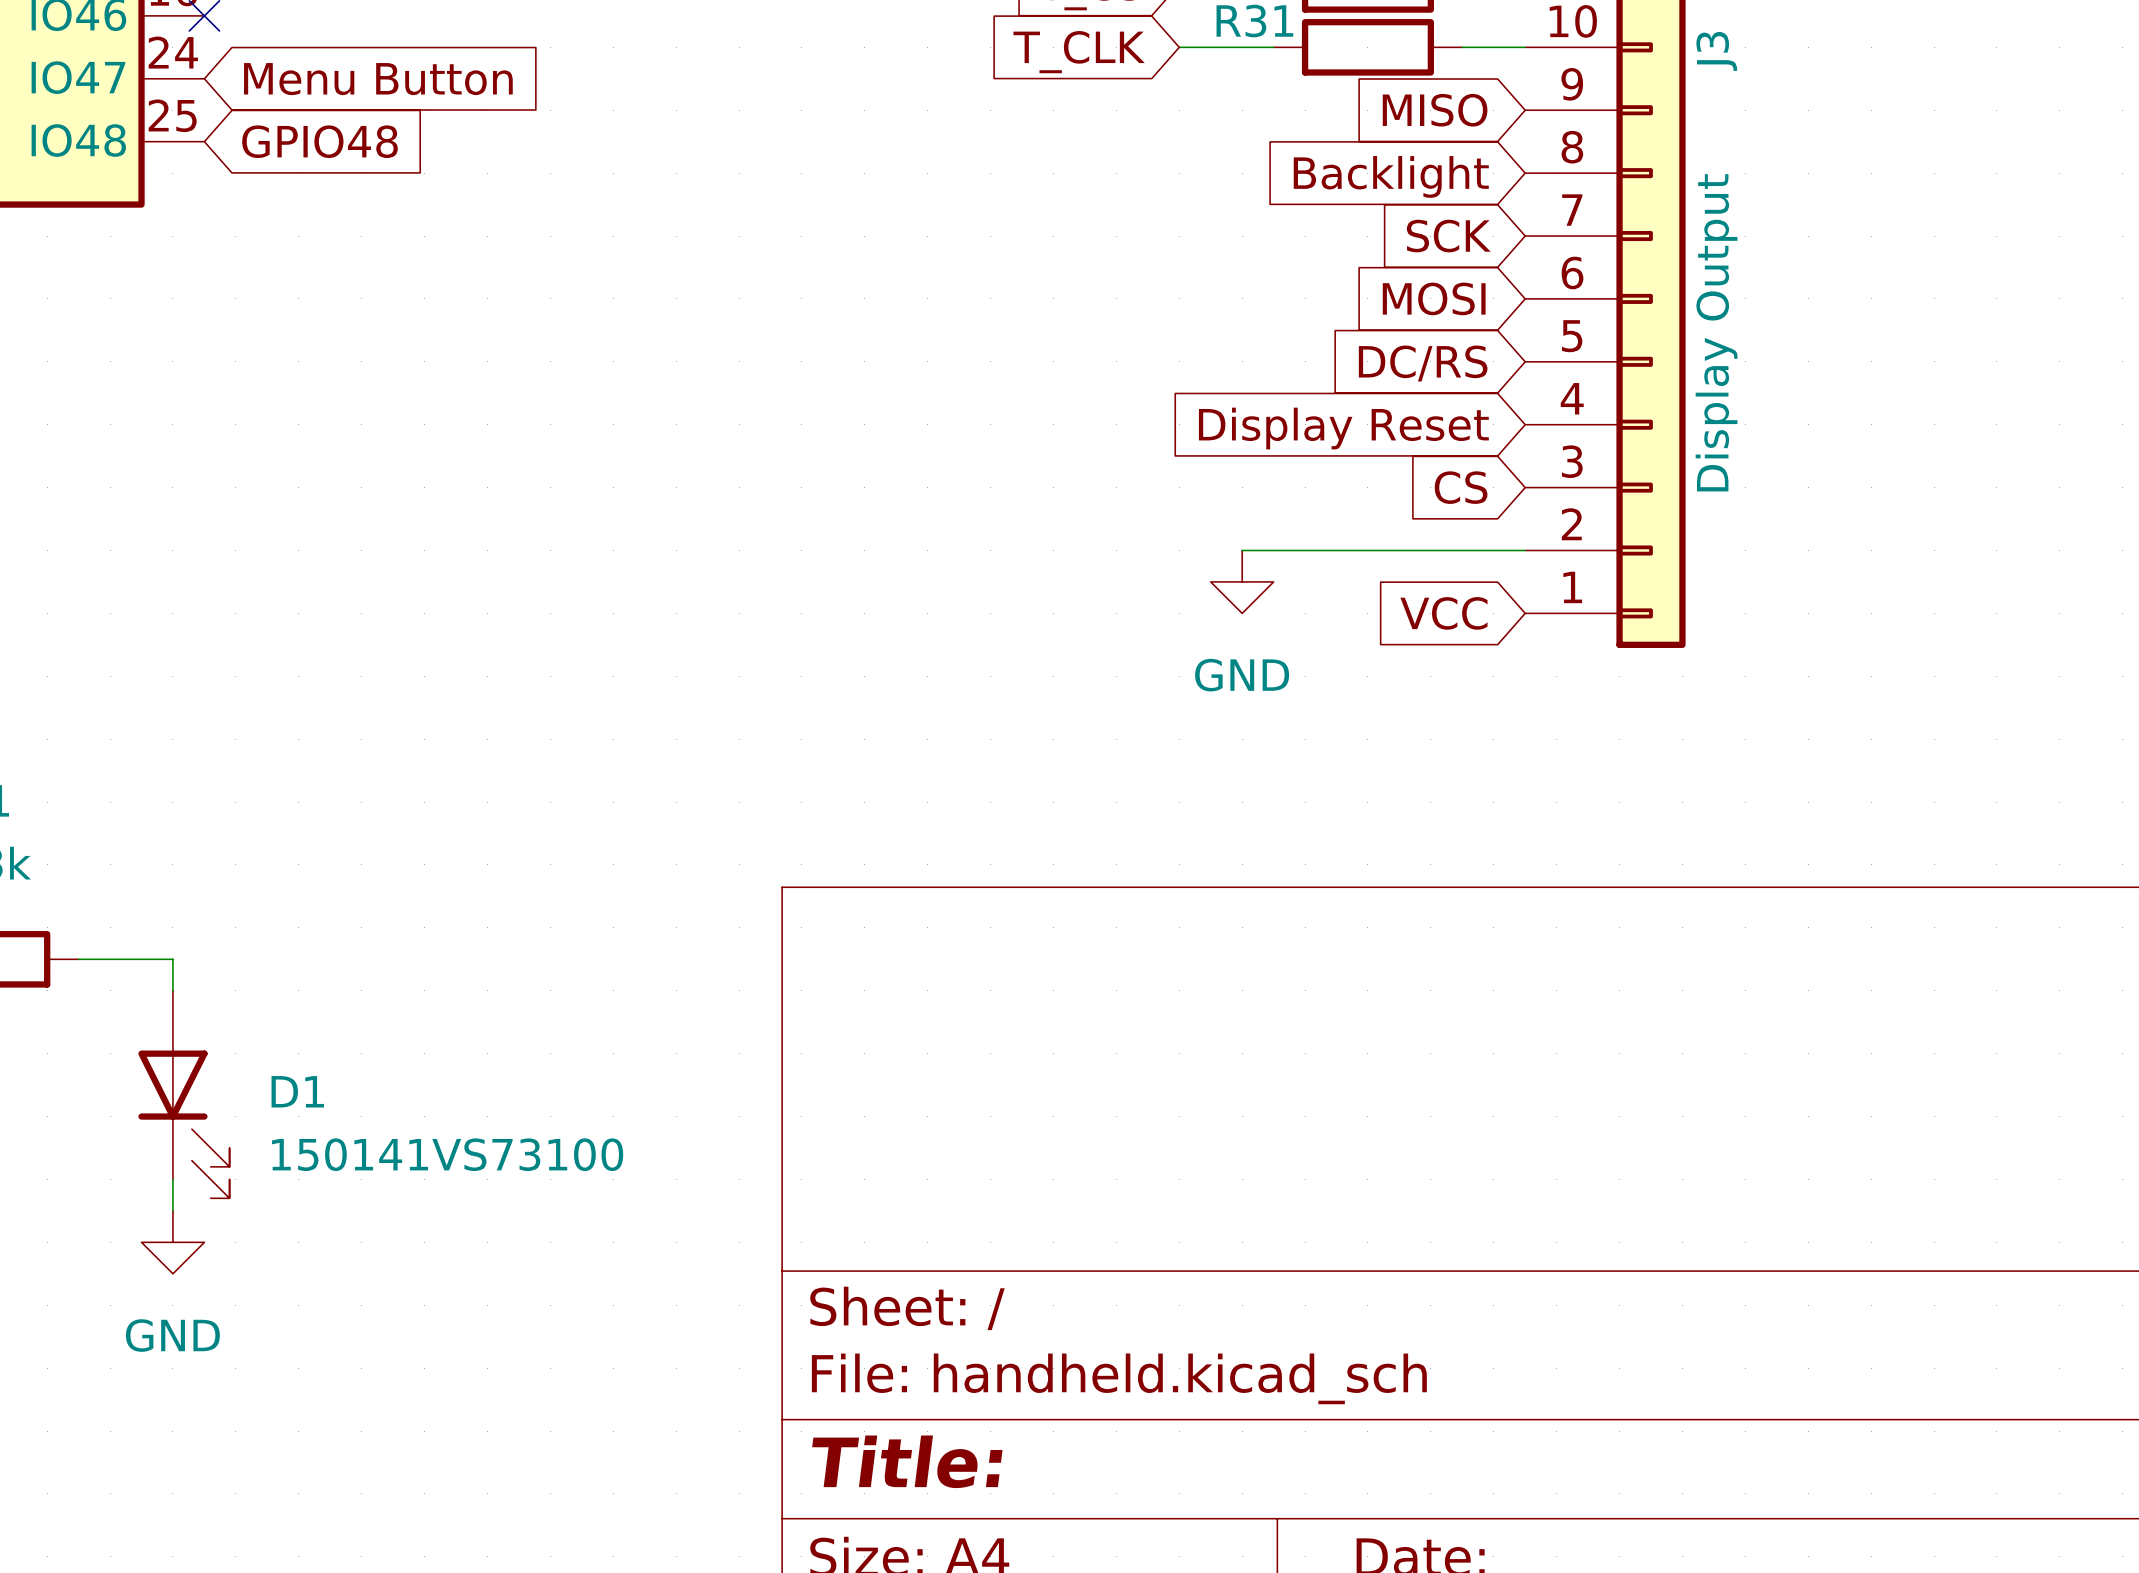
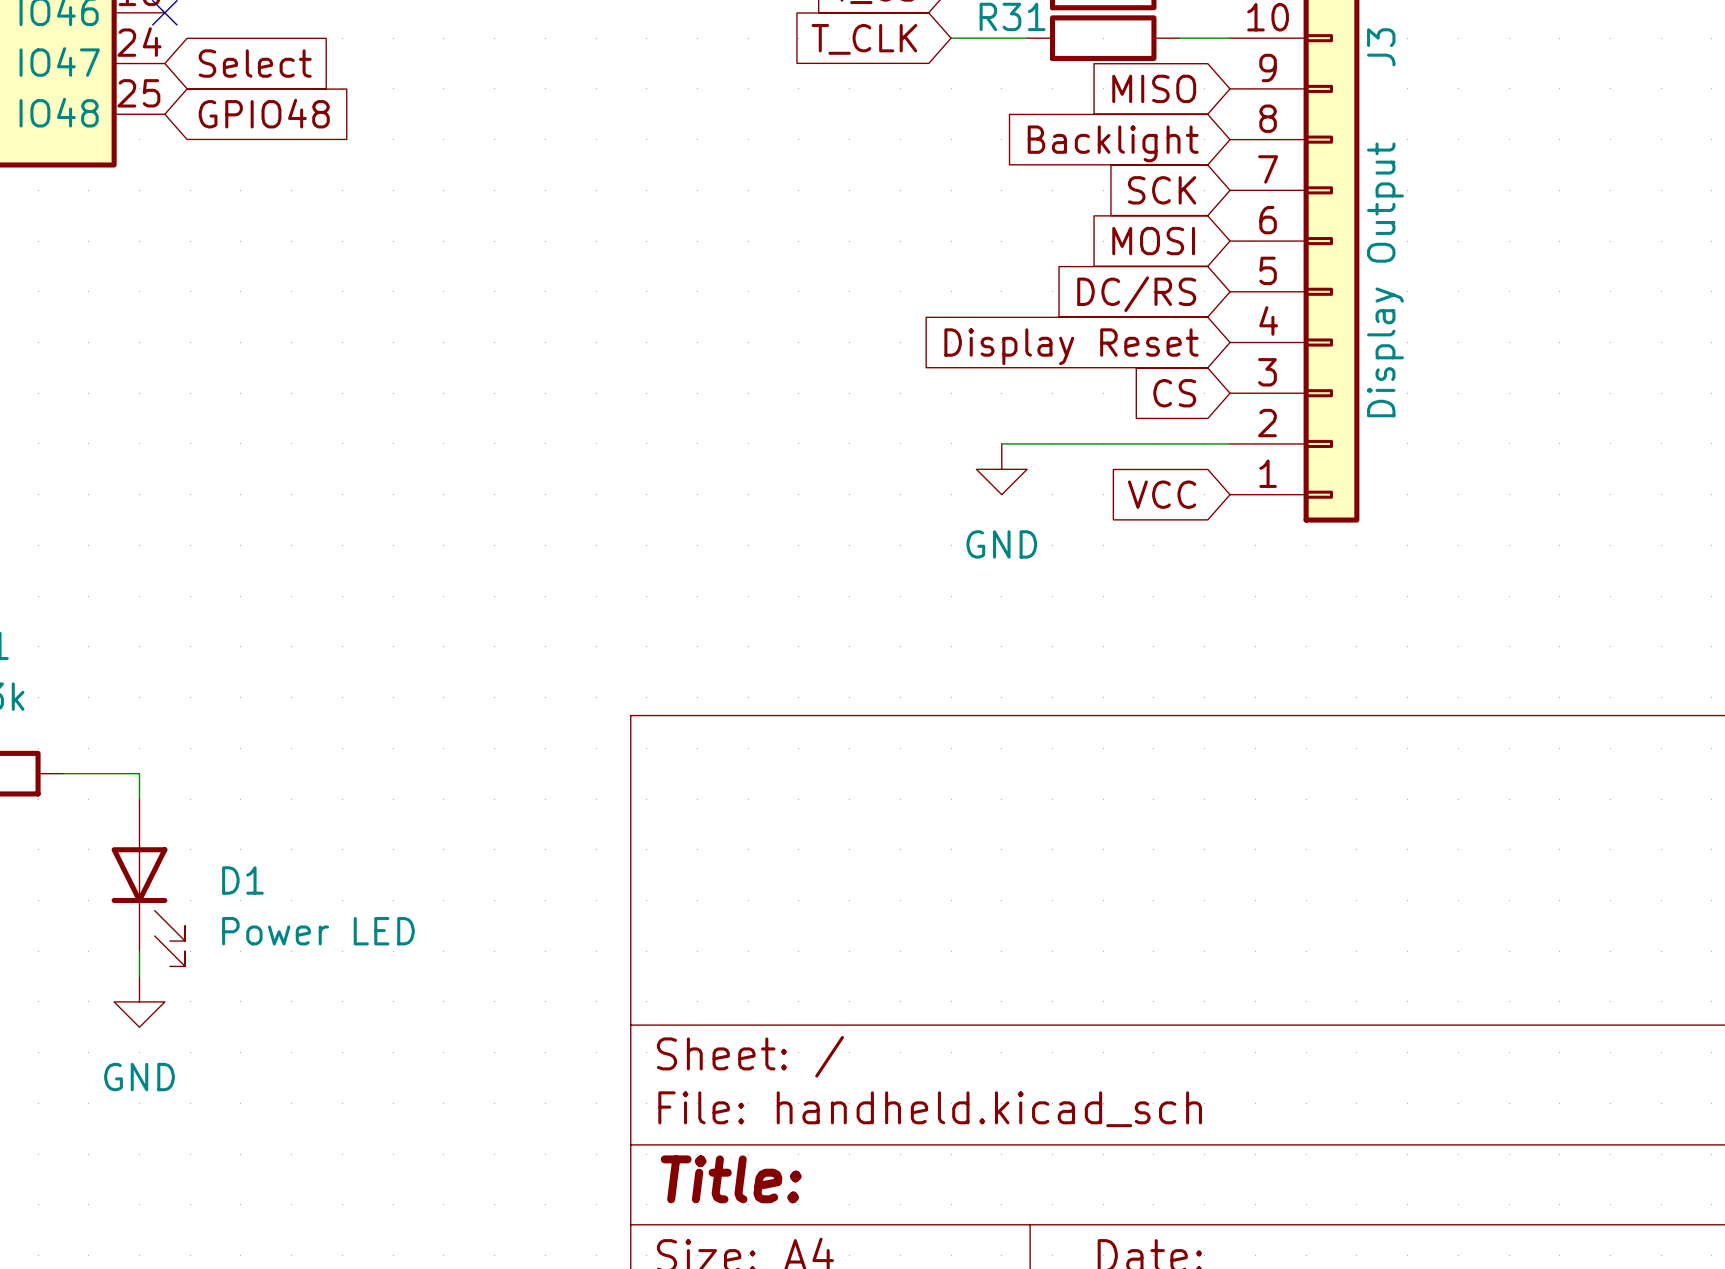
global label: Menu Button (378, 79) -> Select (255, 63)
D1 value: 150141VS73100 (447, 1154) -> Power LED (318, 931)

